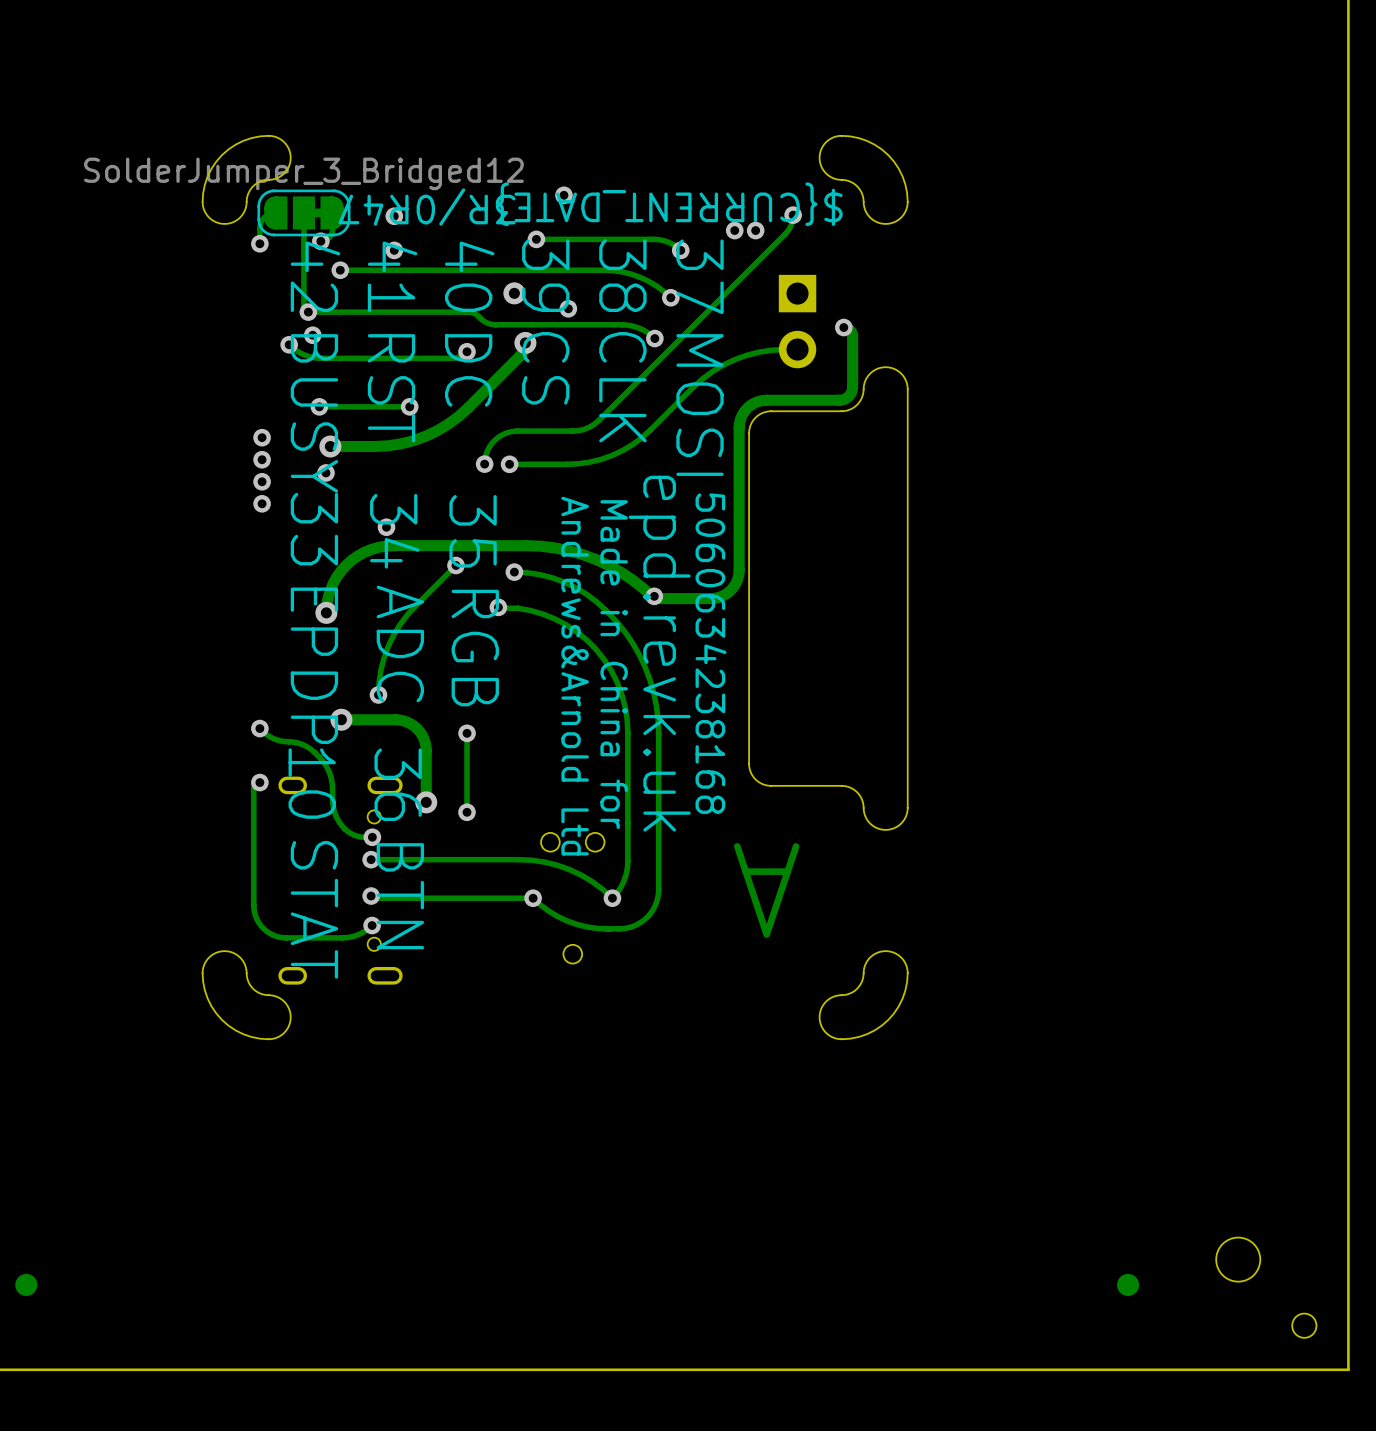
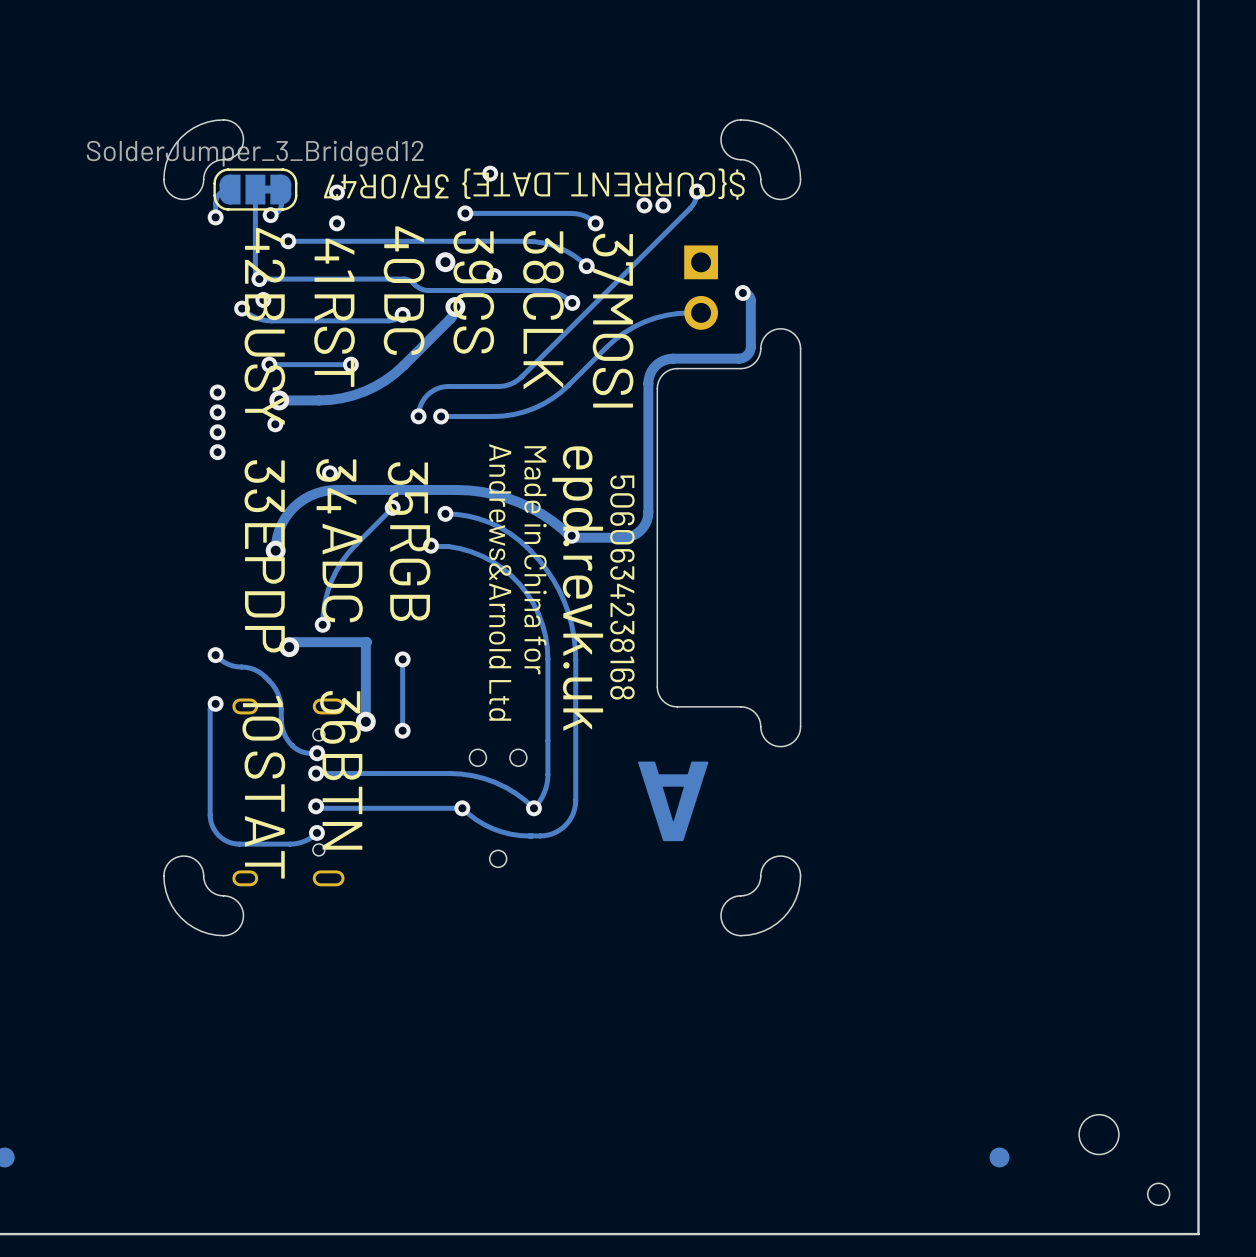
track: (341, 719) (395, 719) (407, 722) (419, 731) (423, 738) (426, 750) -> (289, 647) (294, 642) (366, 642) (365, 675)

